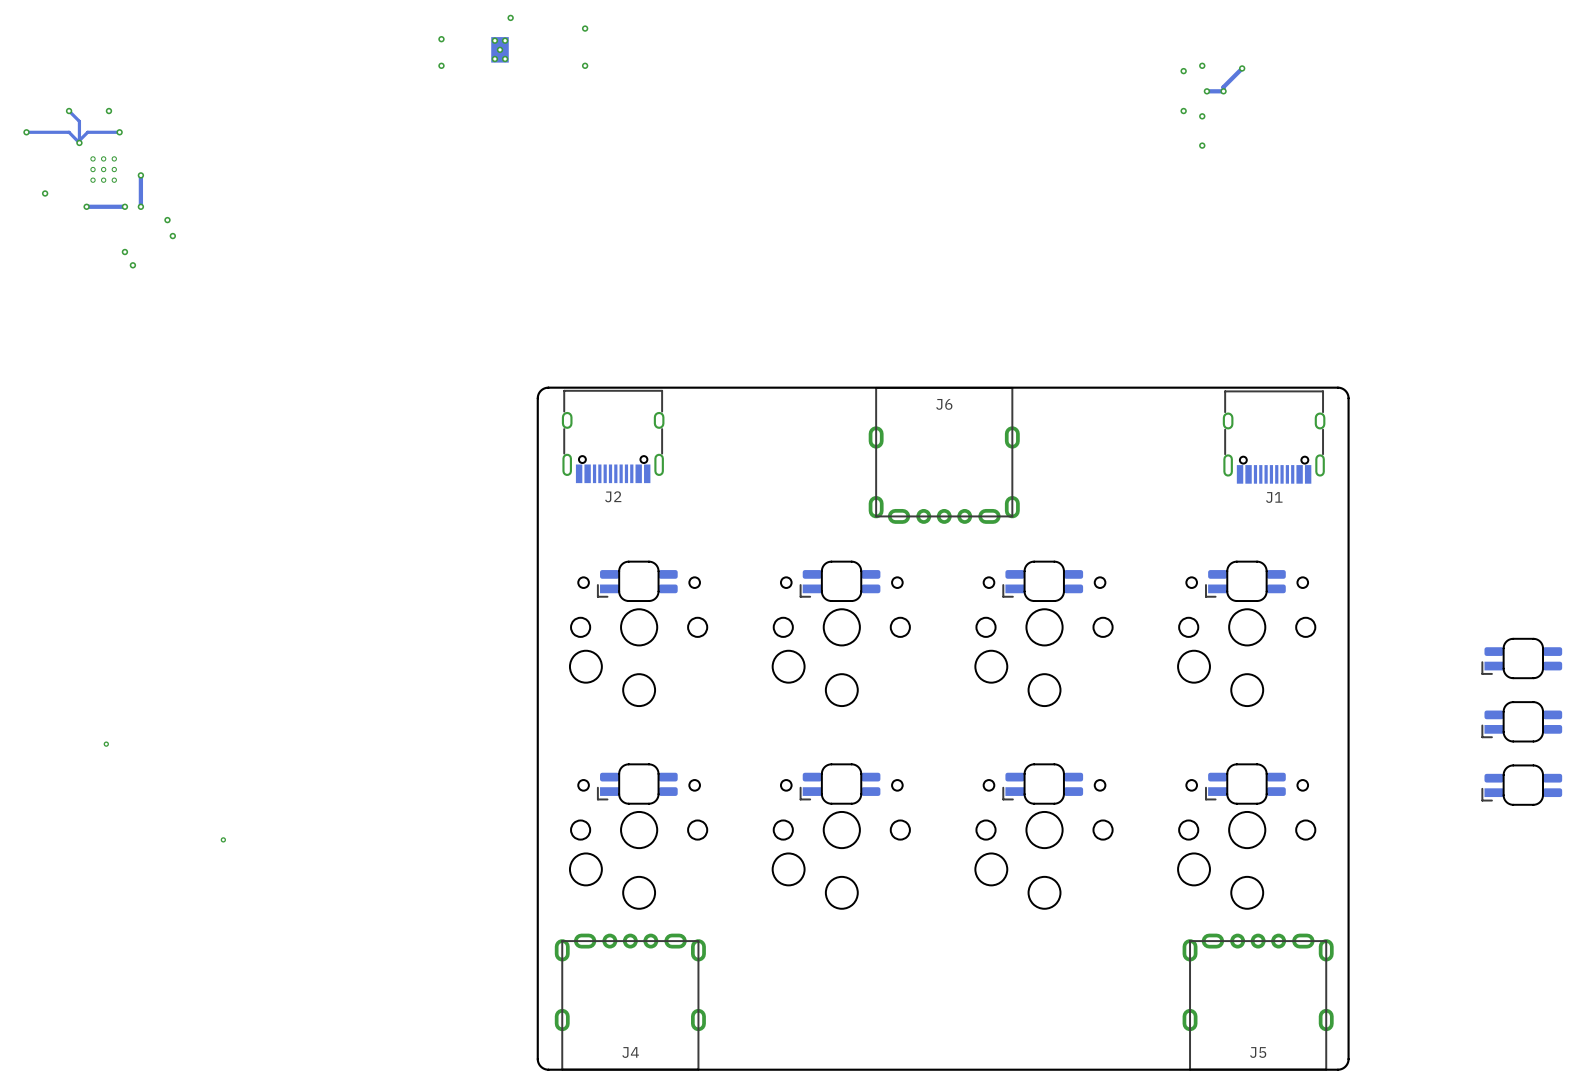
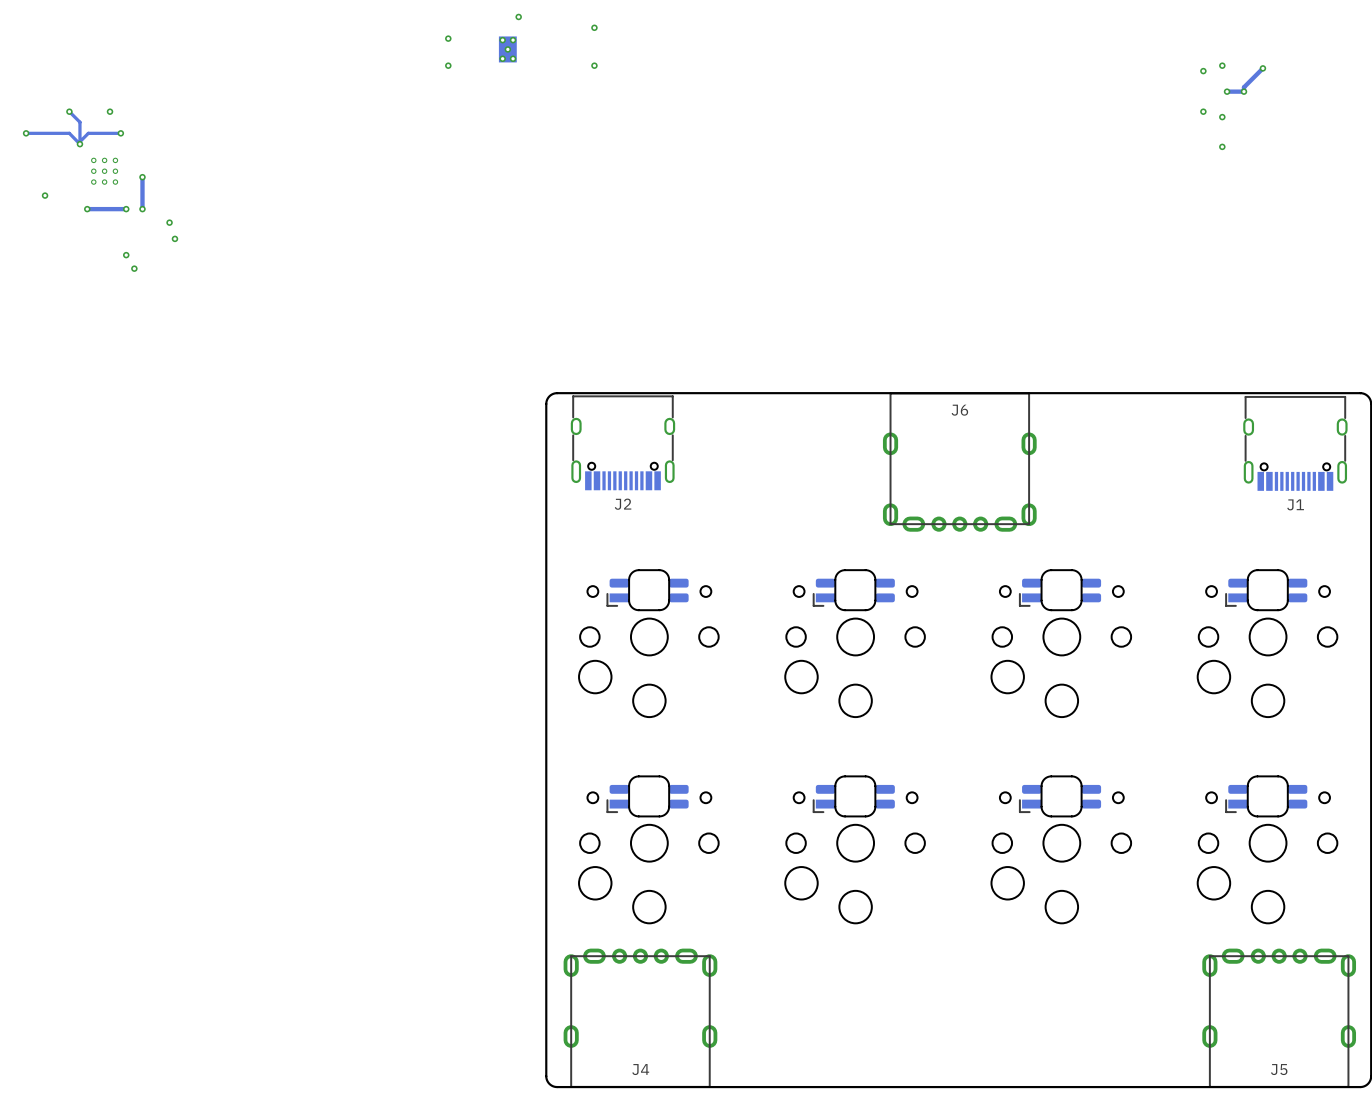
via: (106, 744) -> none
via: (223, 839) -> none

